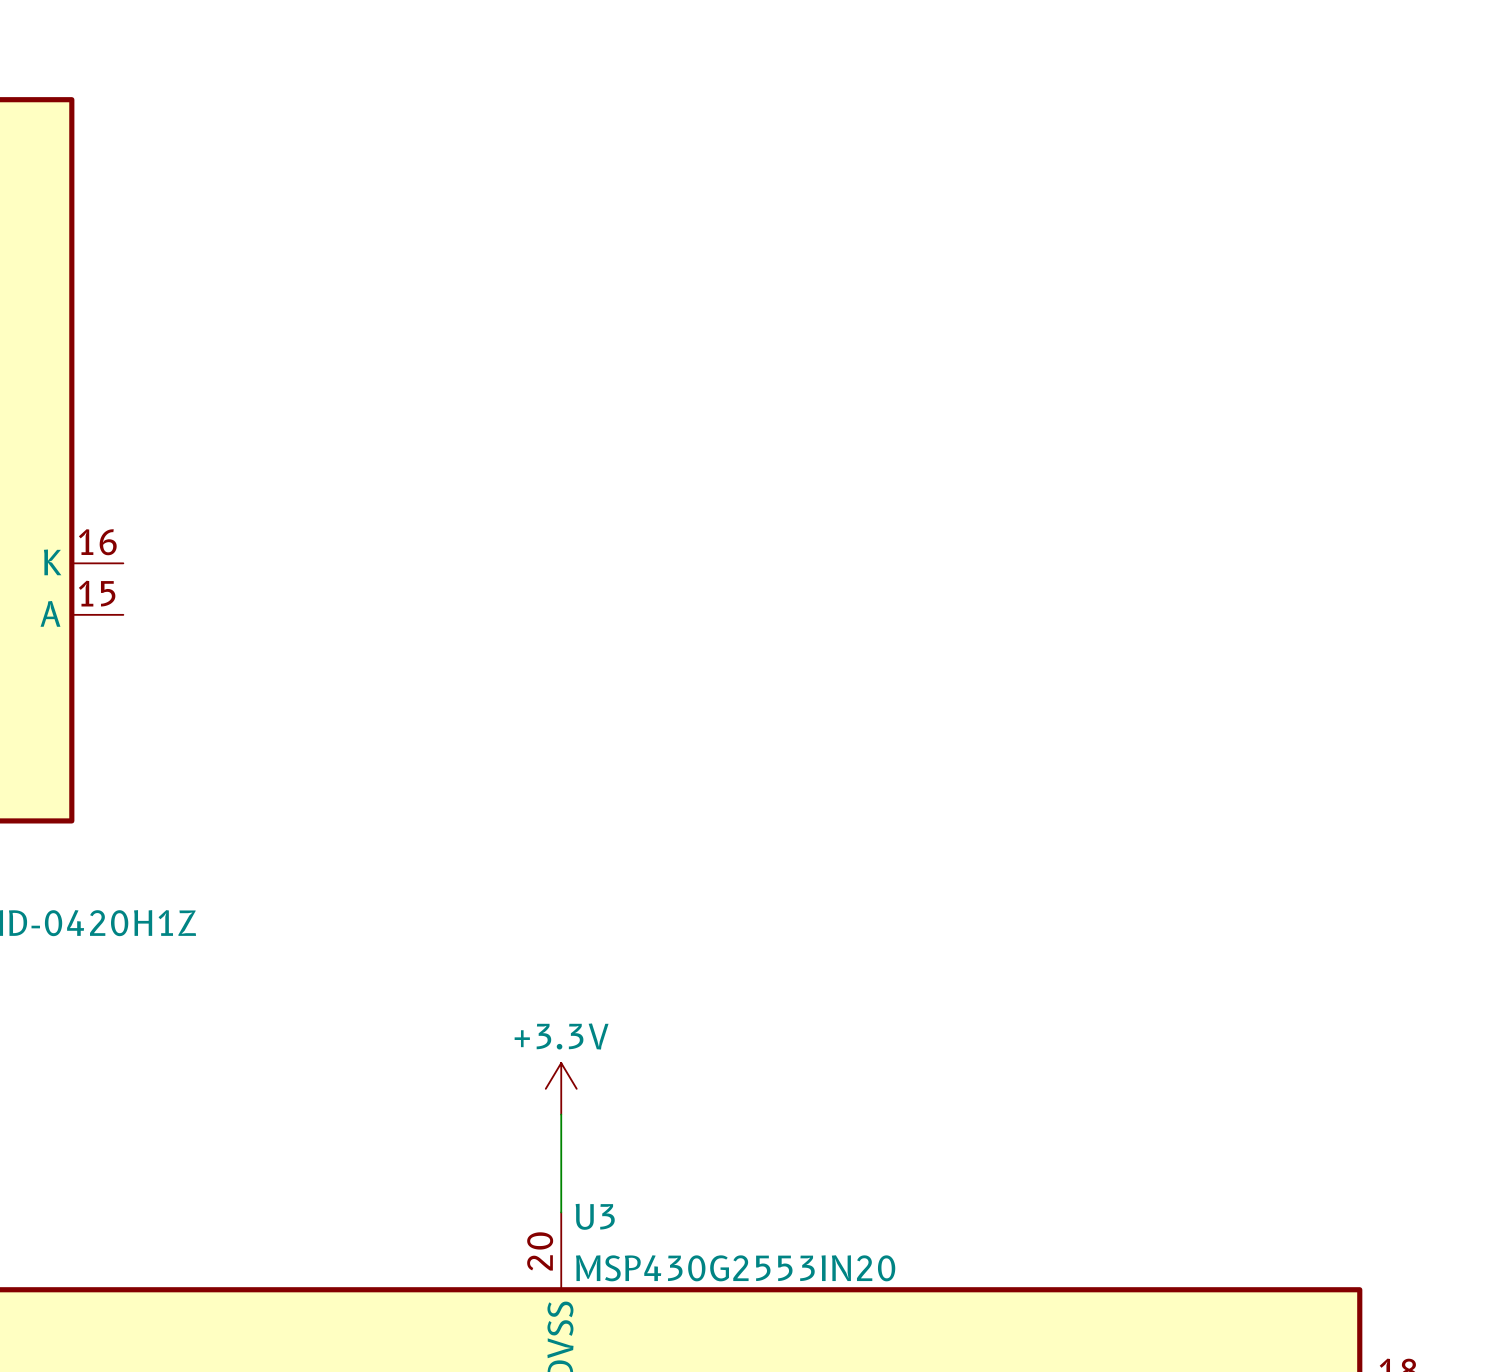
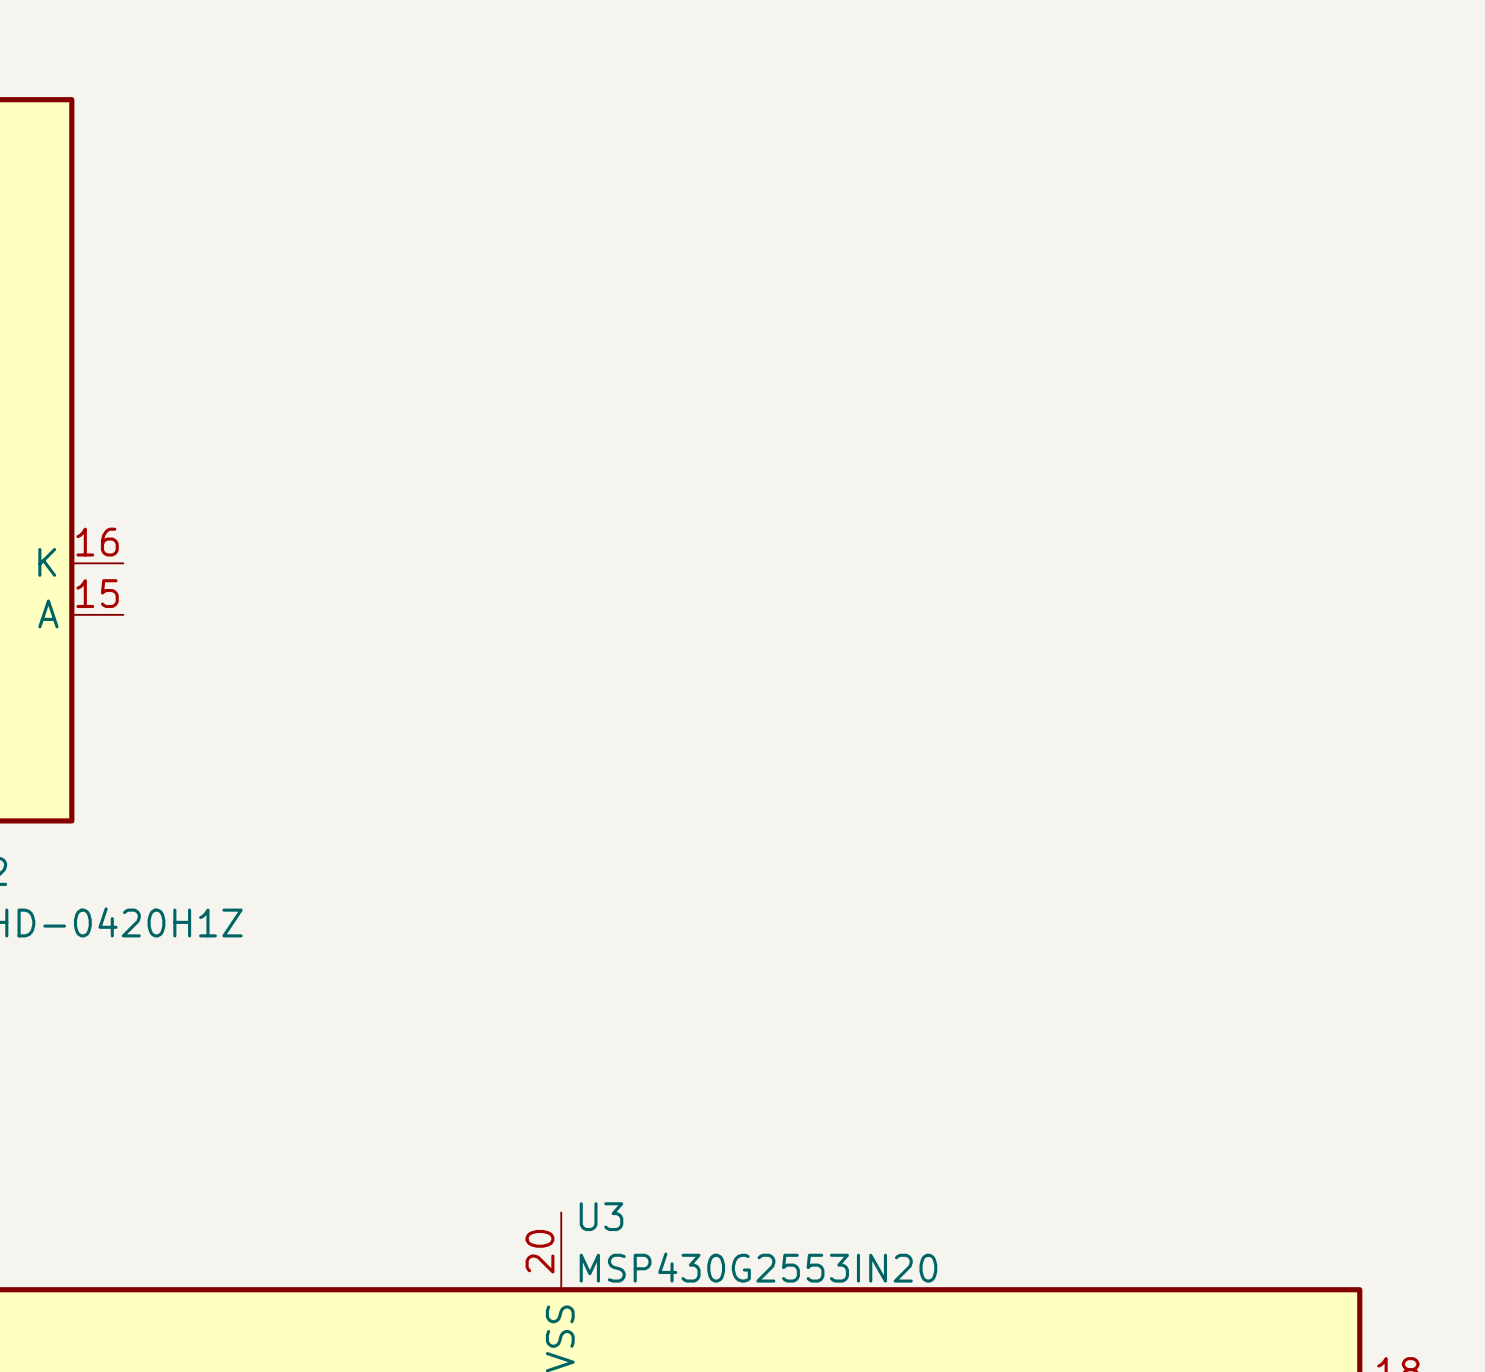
power symbol: +3.3V (561, 1088) -> none
wire: (561, 1114) (561, 1212) -> none

